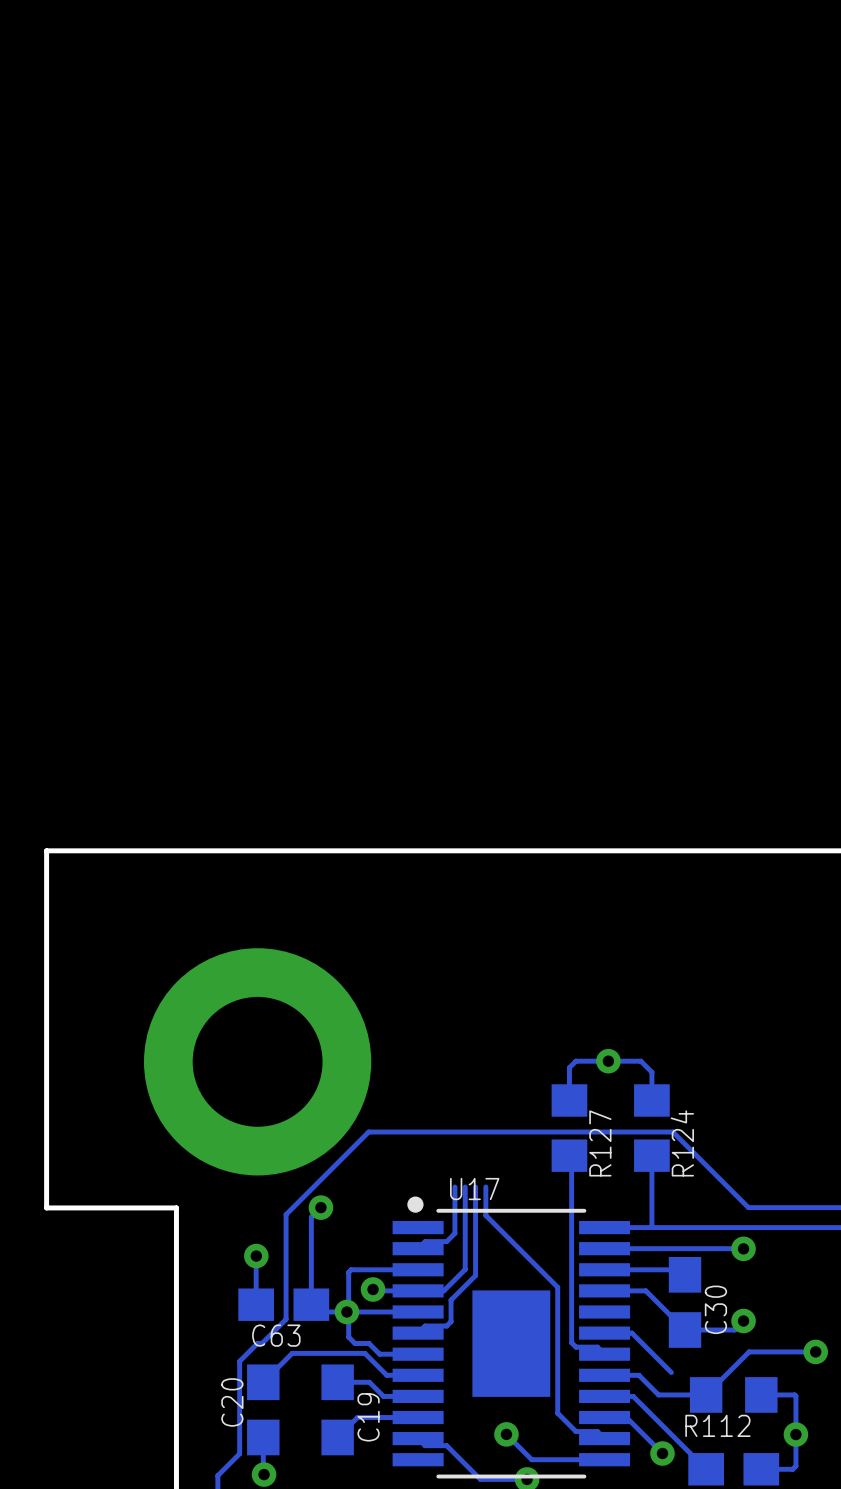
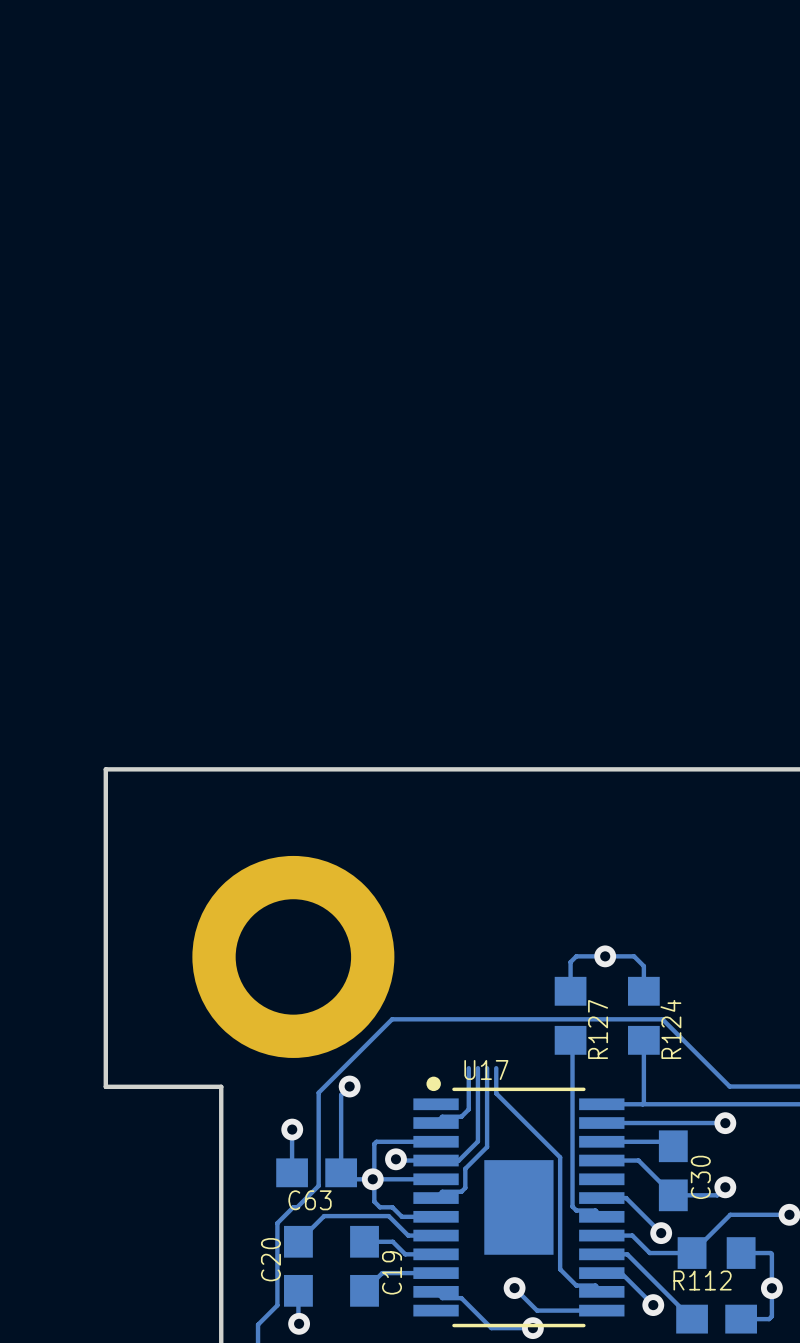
via: none -> (661, 1233)

